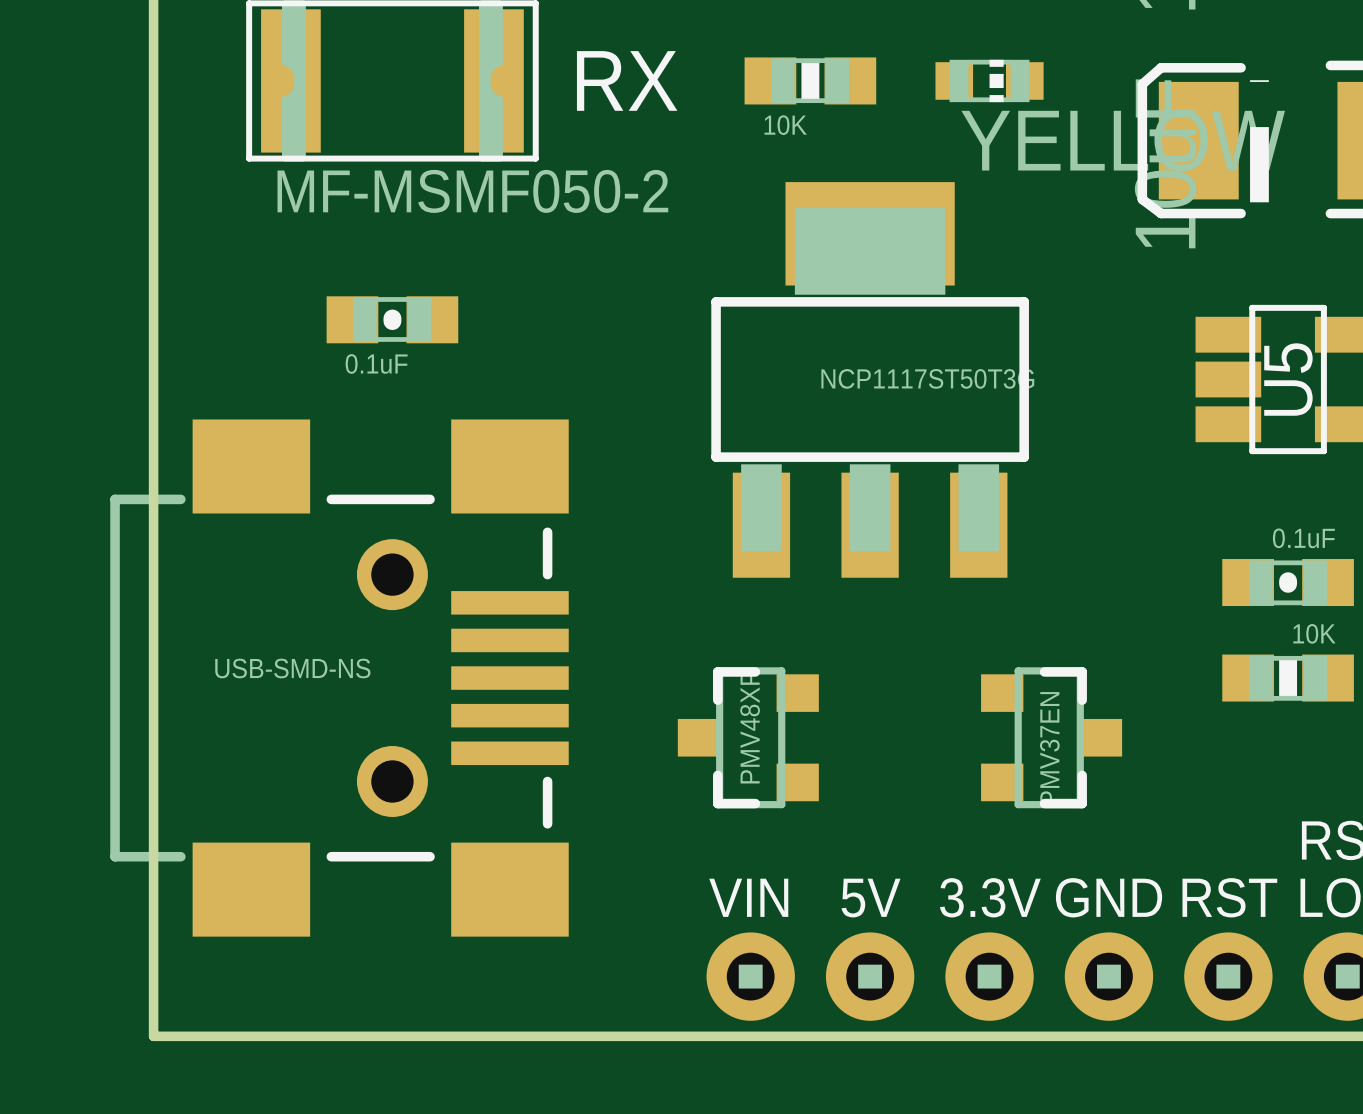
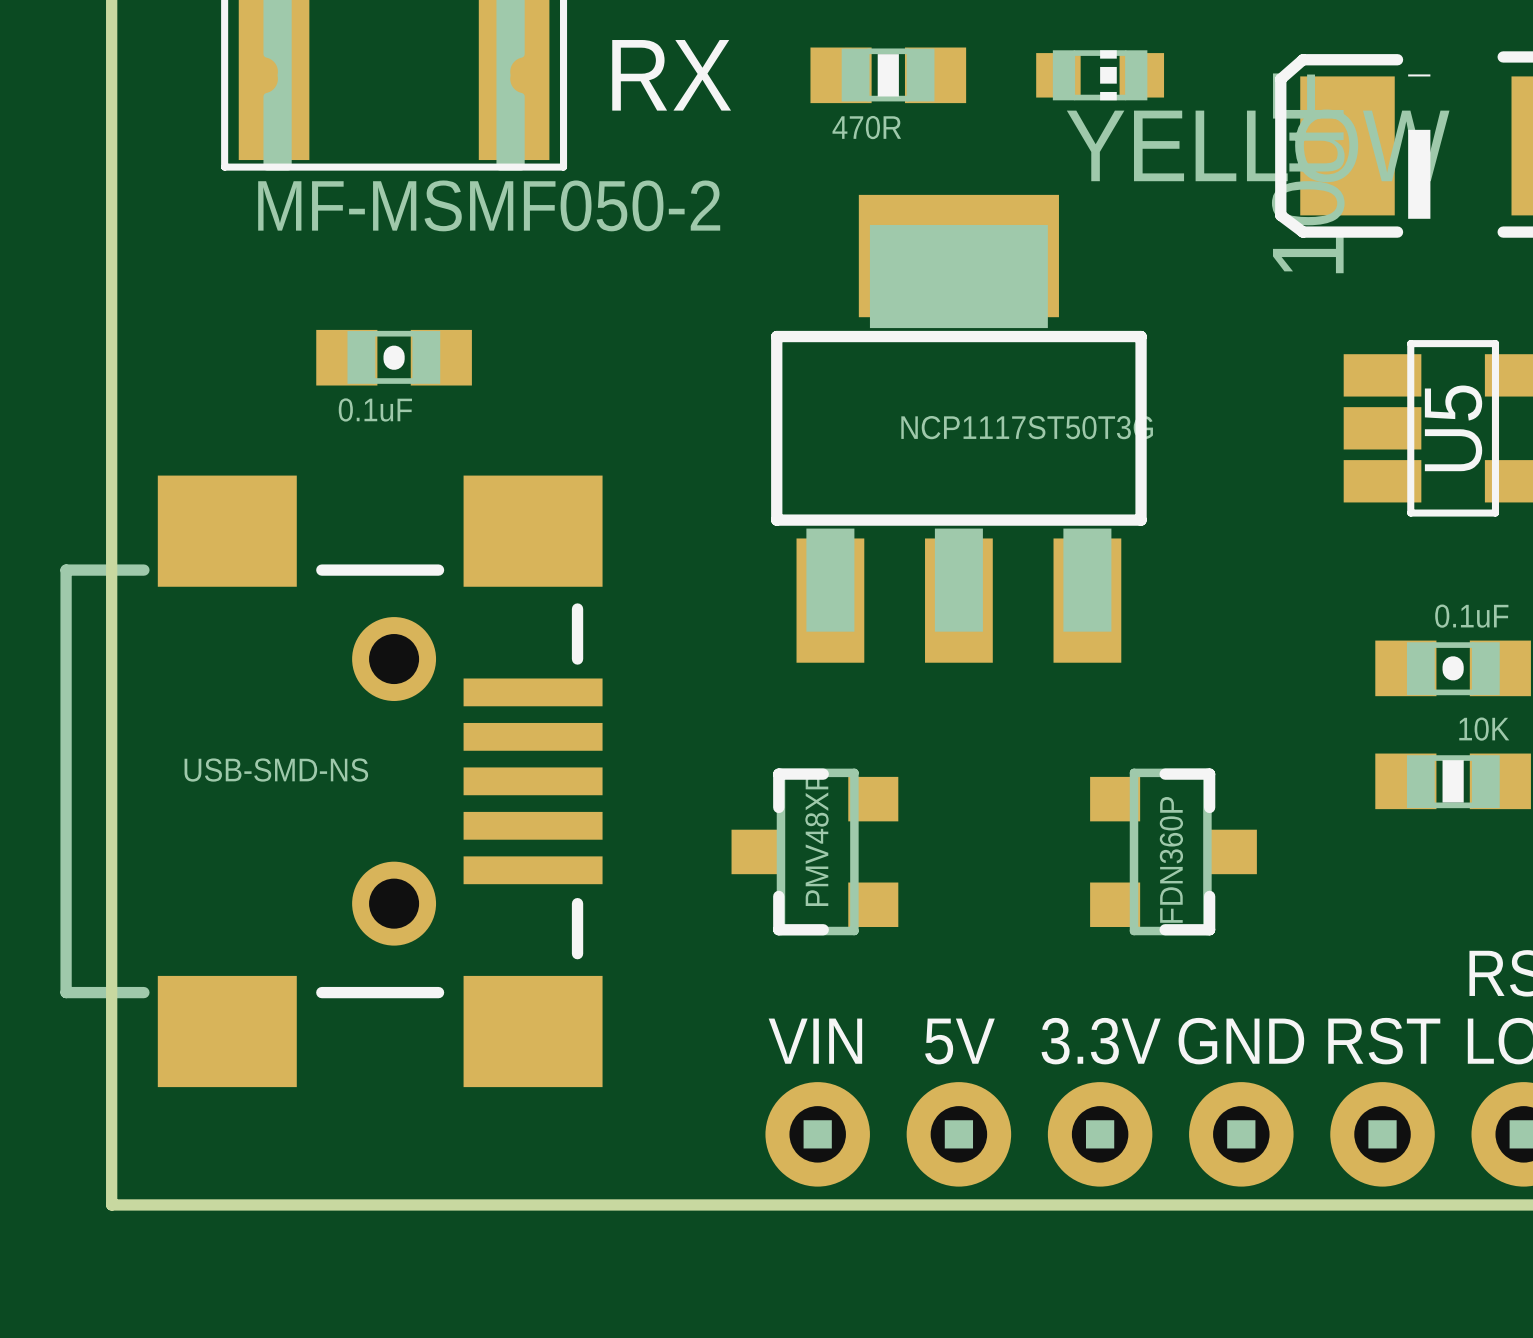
part value: 10K (785, 125) -> 470R (866, 127)
part value: PMV37EN (1049, 748) -> FDN360P (1171, 859)

